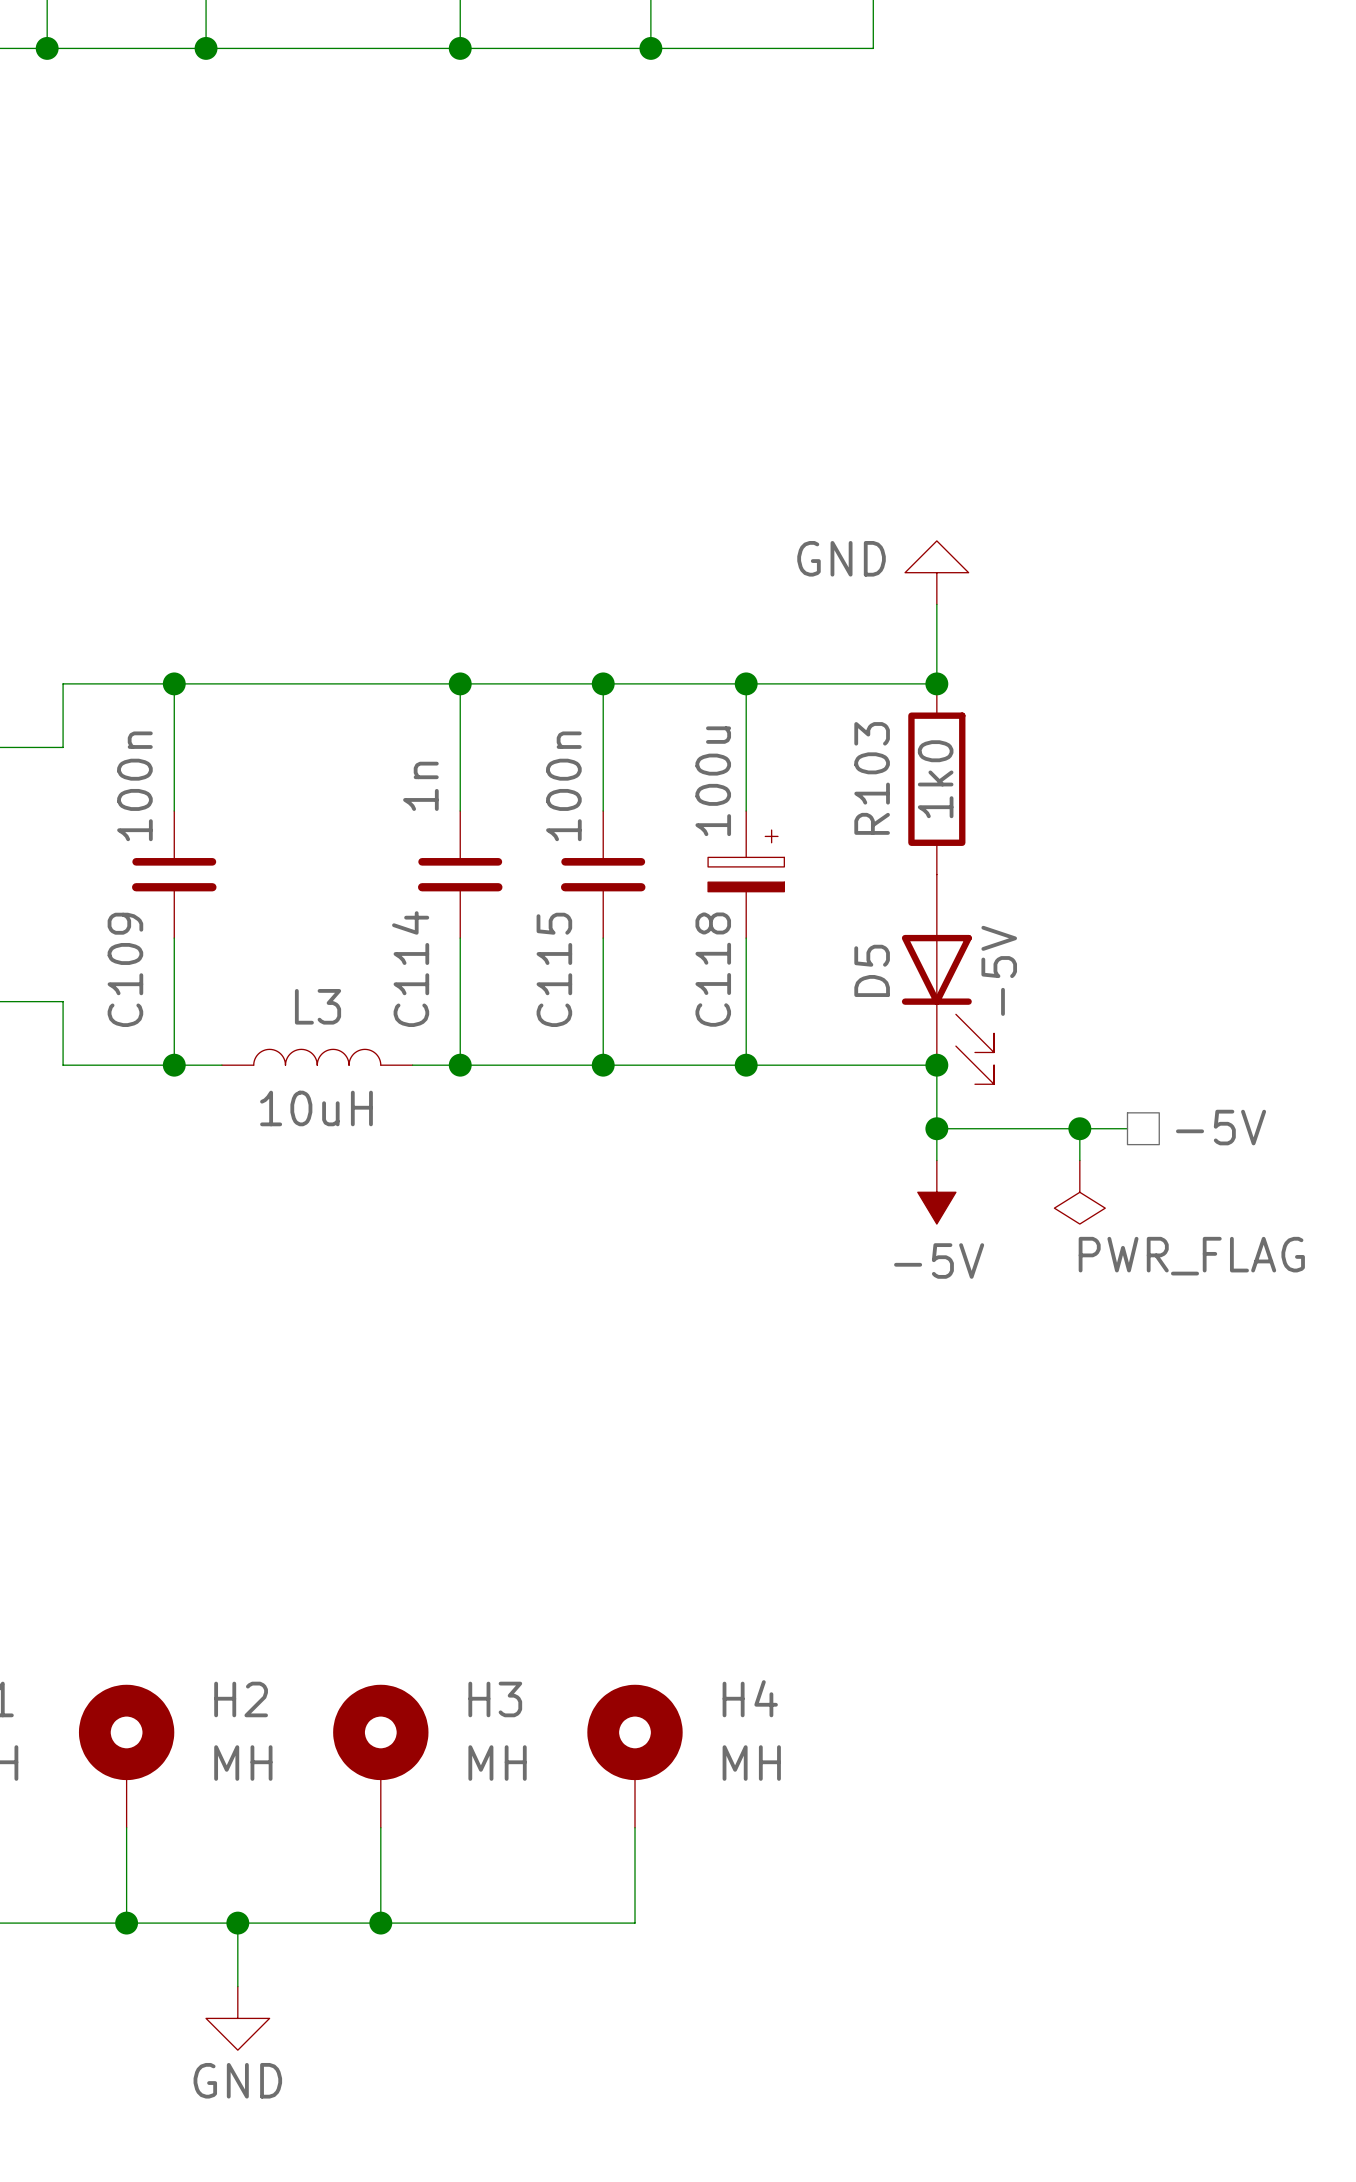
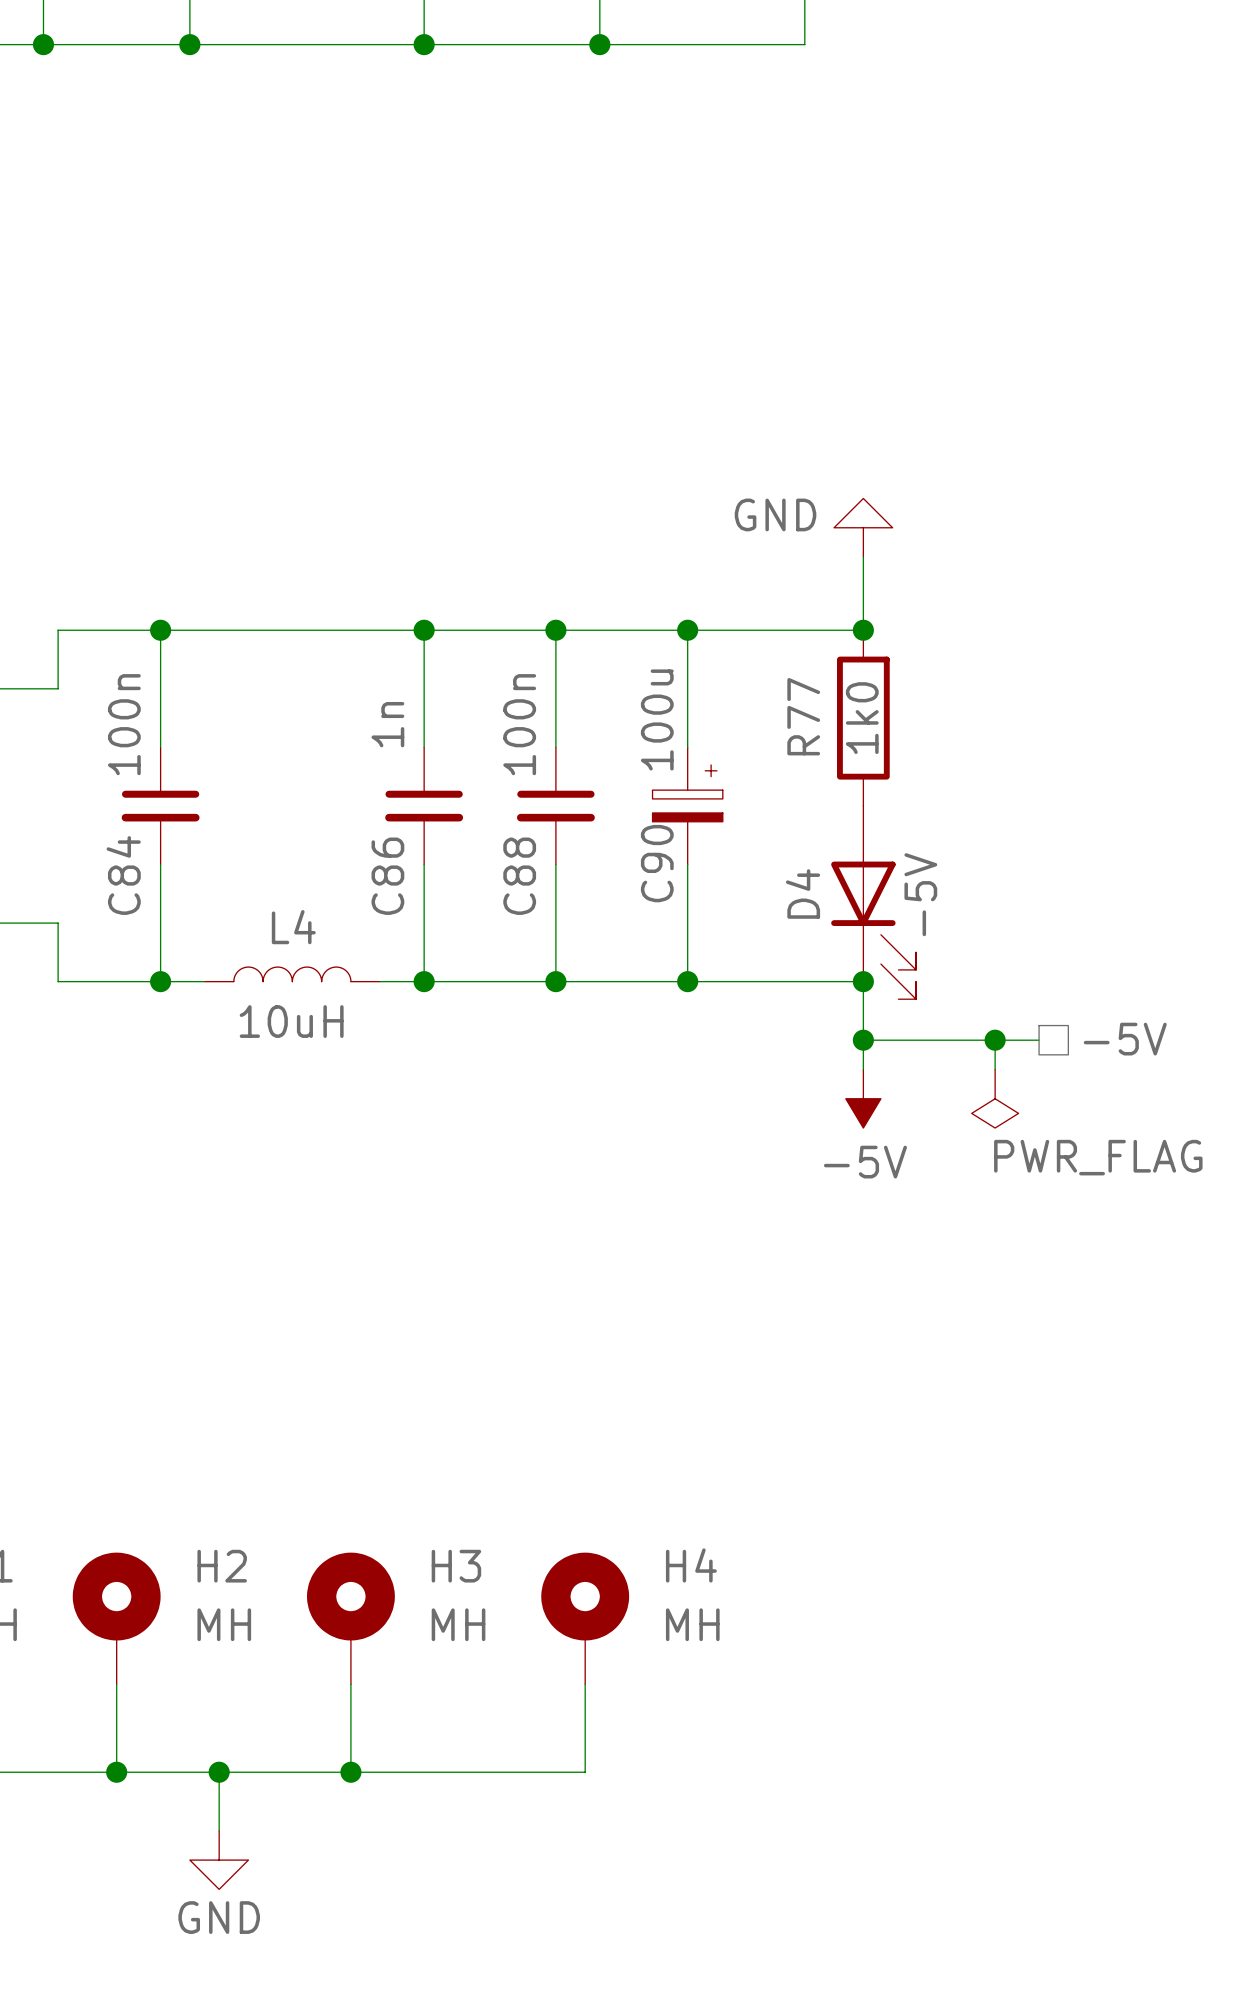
R103 name: R103 (872, 778) -> R77 (803, 716)
C109 name: C109 (125, 969) -> C84 (123, 875)
C114 name: C114 (410, 969) -> C86 (387, 876)
C115 name: C115 (554, 969) -> C88 (519, 876)
C118 name: C118 (713, 969) -> C90 (657, 863)
D5 name: D5 (872, 970) -> D4 (803, 894)
L3 name: L3 (318, 1006) -> L4 (293, 927)

